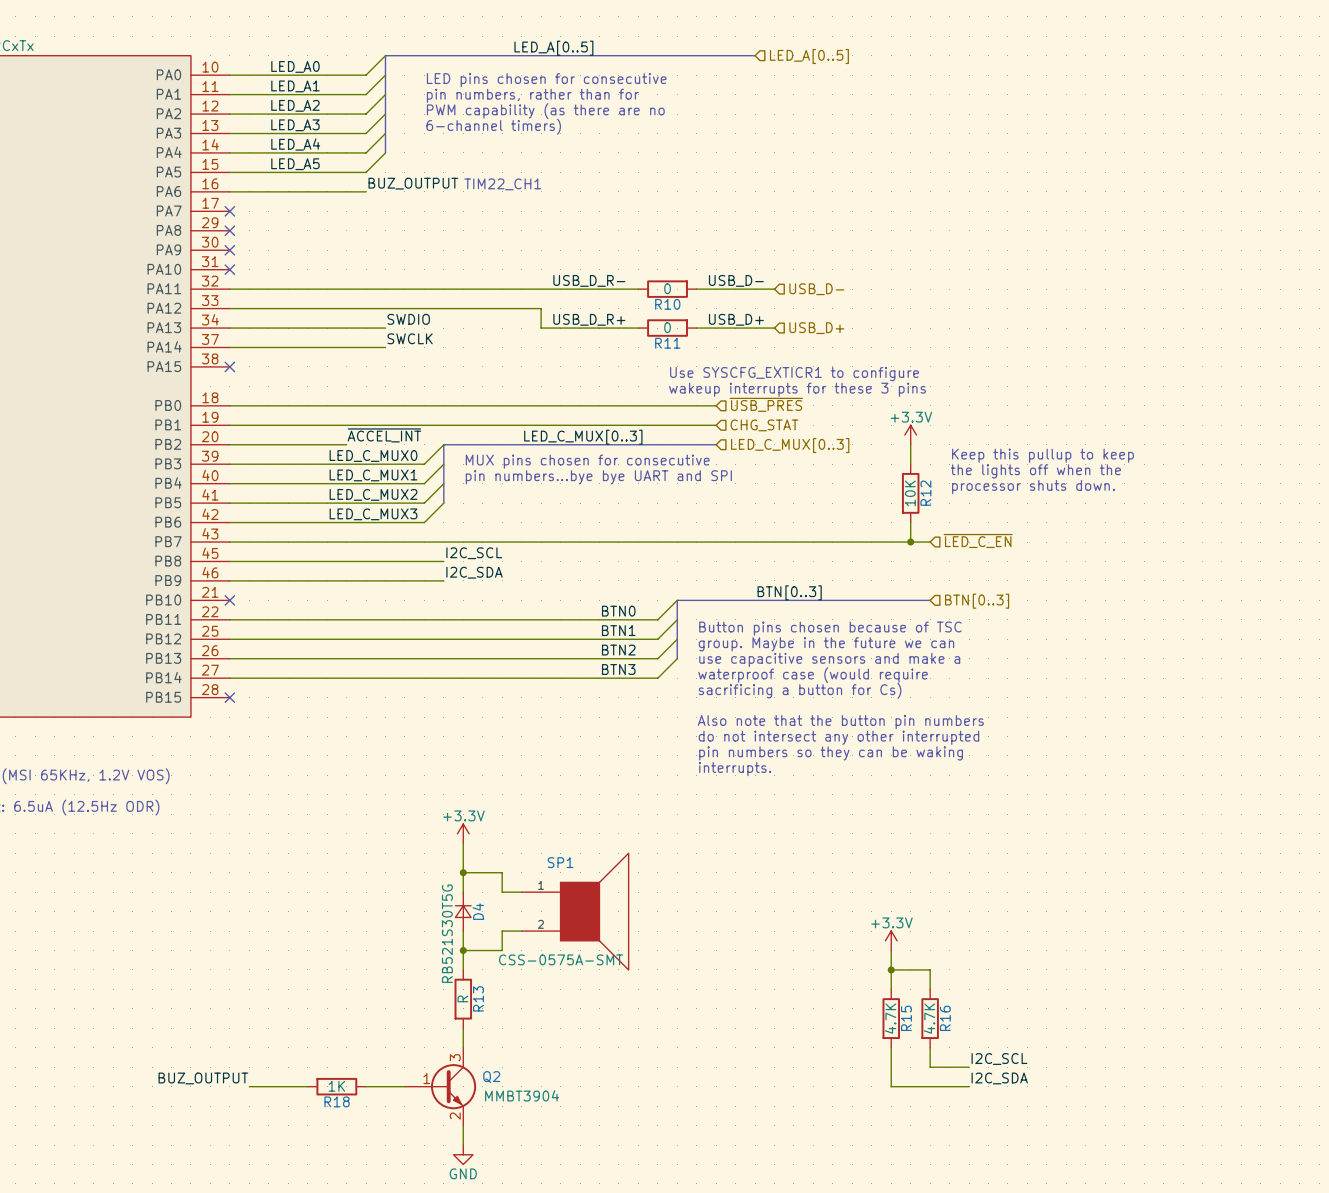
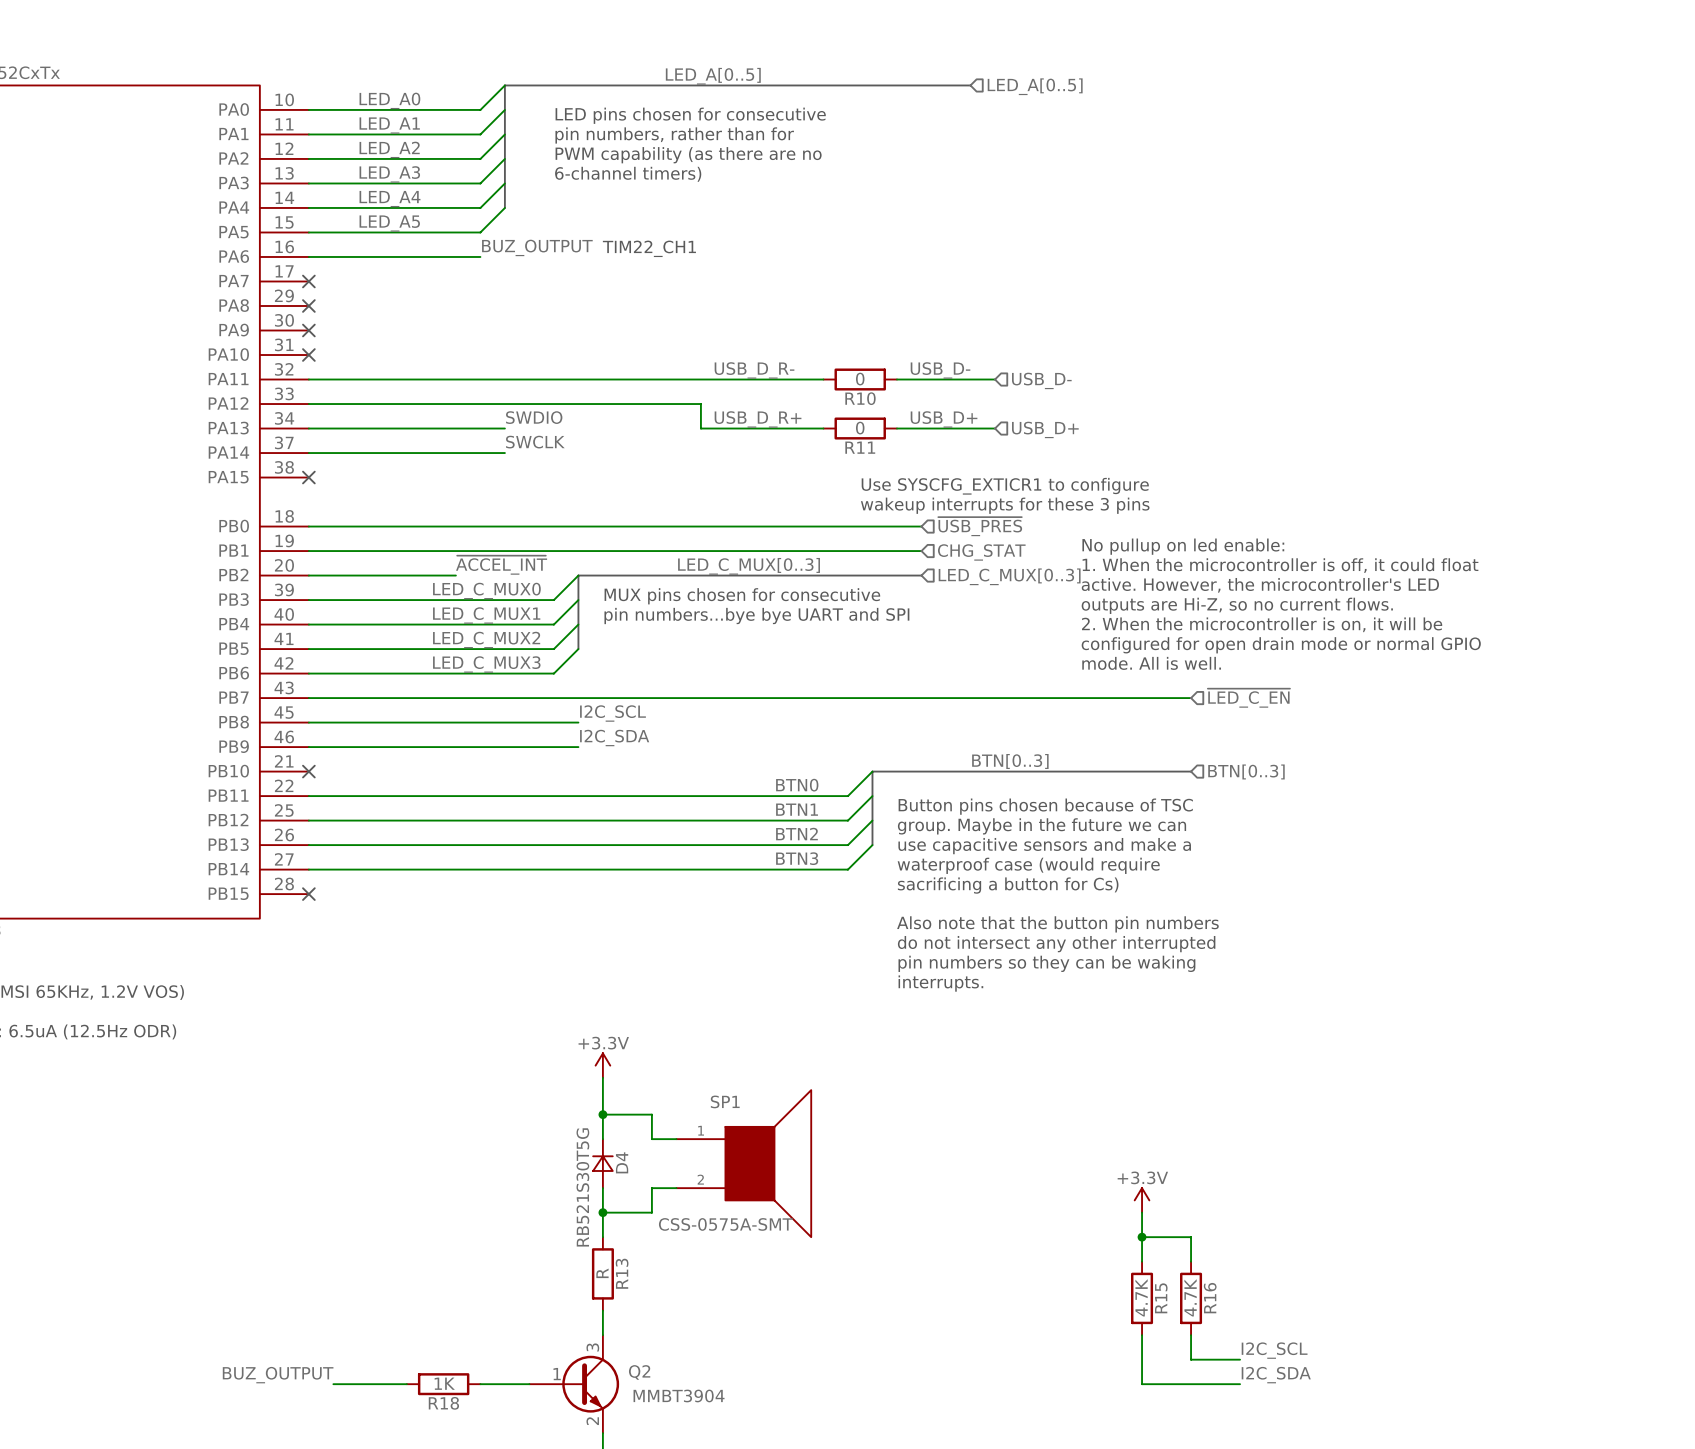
text: none -> No pullup on led enable: (1183, 546)
power symbol: +3.3V (910, 435) -> none
text: none -> 1. When the microcontroller is off, it could float (1280, 565)
wire: (910, 444) (910, 464) -> none
text: none -> active. However, the microcontroller's LED (1260, 585)
text: Keep this pullup to keep (1043, 455) -> none
text: none -> outputs are Hi-Z, so no current flows. (1237, 605)
text: the lights off when the (1035, 471) -> none
text: none -> 2. When the microcontroller is on, it will be (1262, 624)
text: processor shuts down. (1033, 487) -> none
R12: 10K (910, 493) -> none
text: none -> configured for open drain mode or normal GPIO (1281, 645)
text: none -> mode. All is well. (1151, 663)
wire: (910, 522) (910, 542) -> none
junction: (910, 542) -> none

